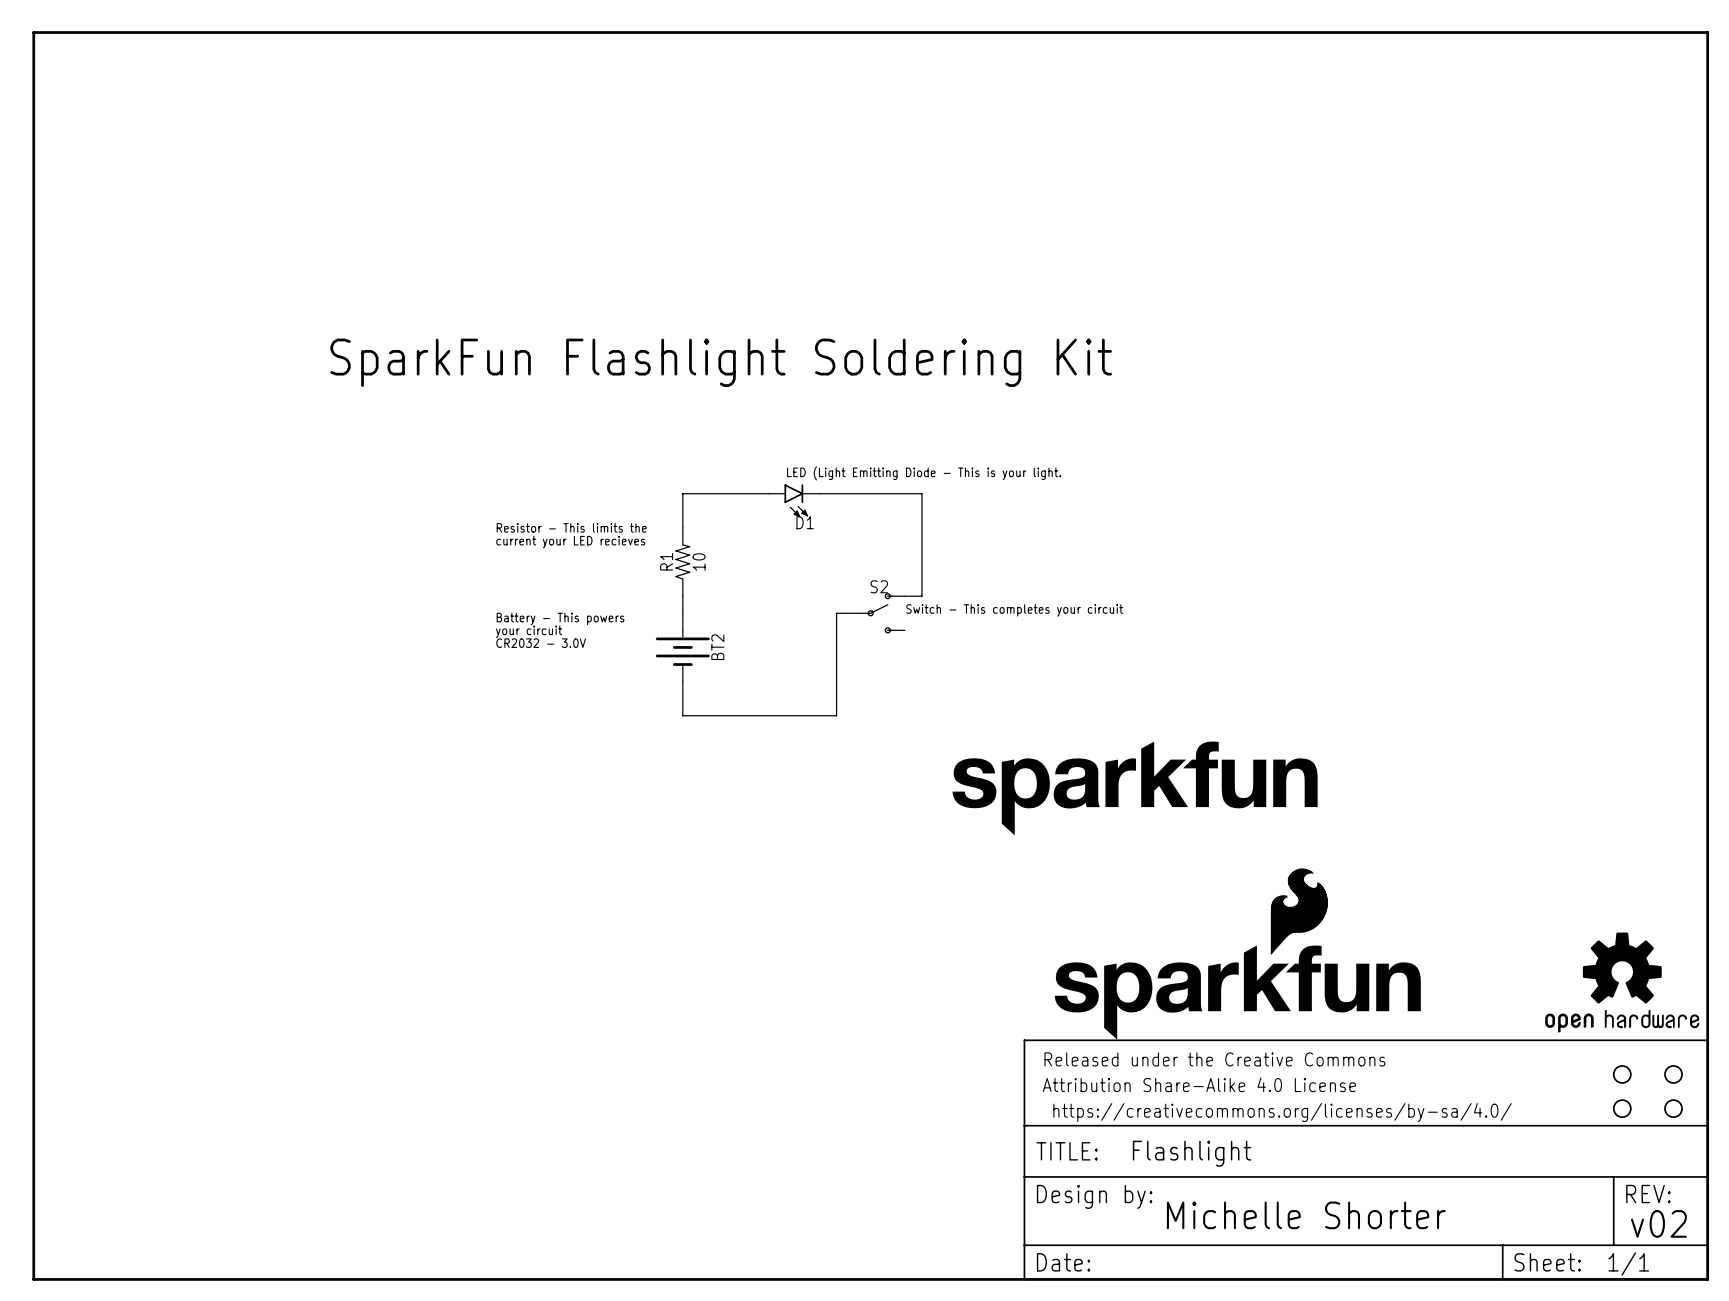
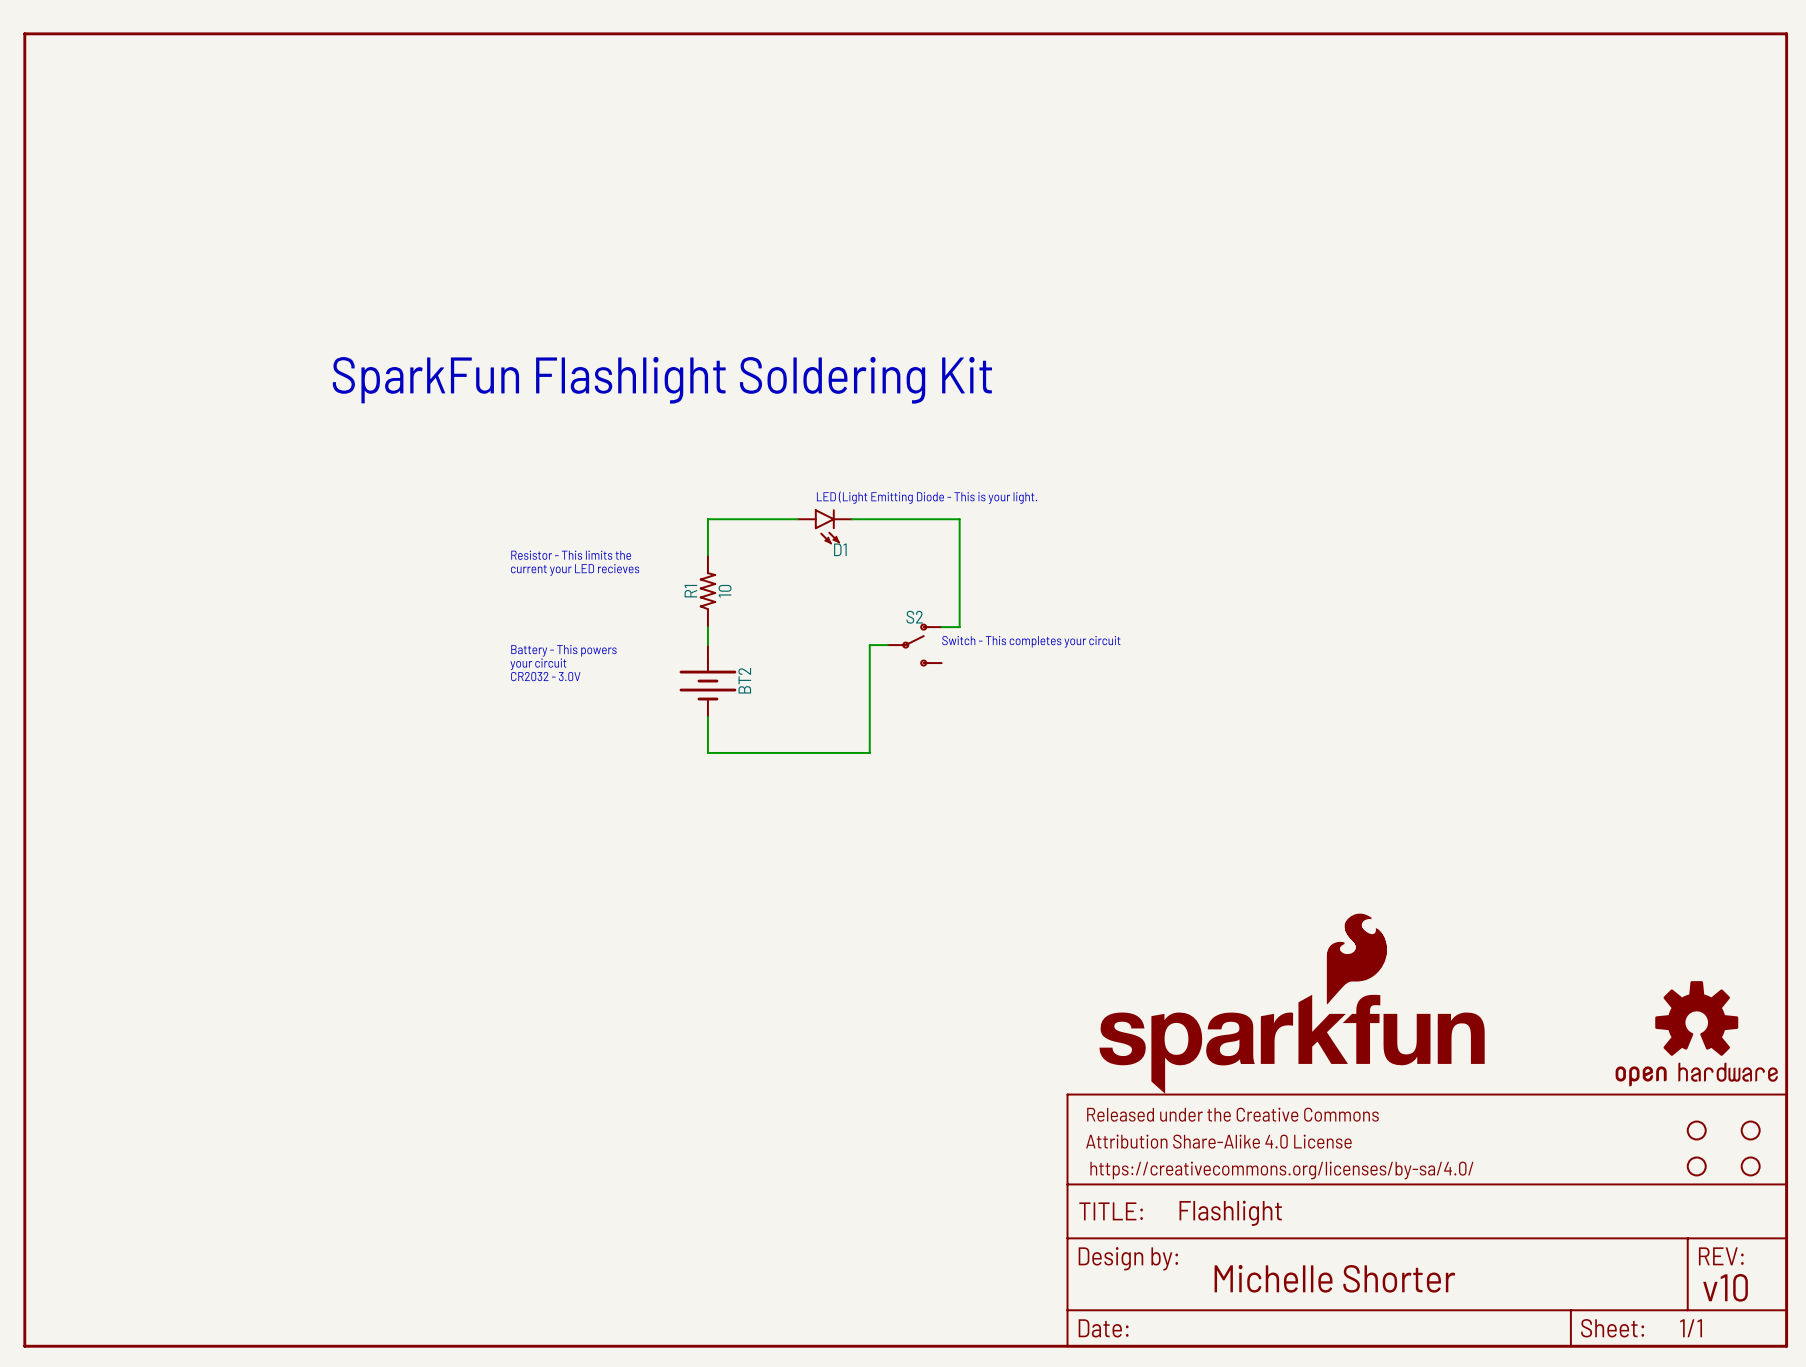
part: (1135, 788) -> none
text: v02 (1658, 1223) -> v10 (1725, 1287)

